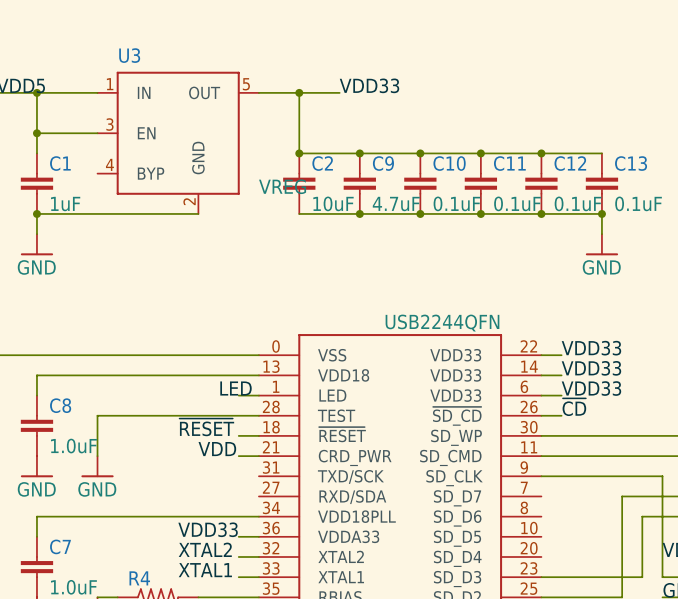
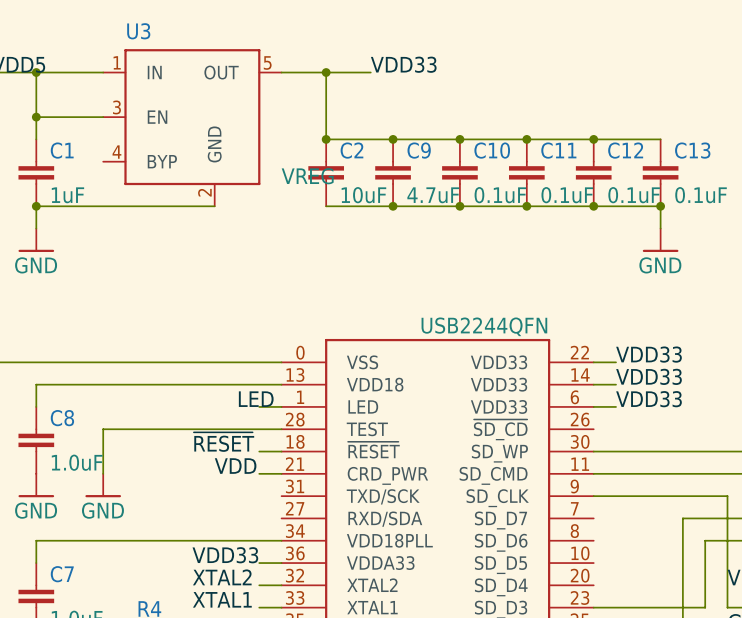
label: ~{CD} (574, 407) -> none
wire: (541, 415) (561, 415) -> none

